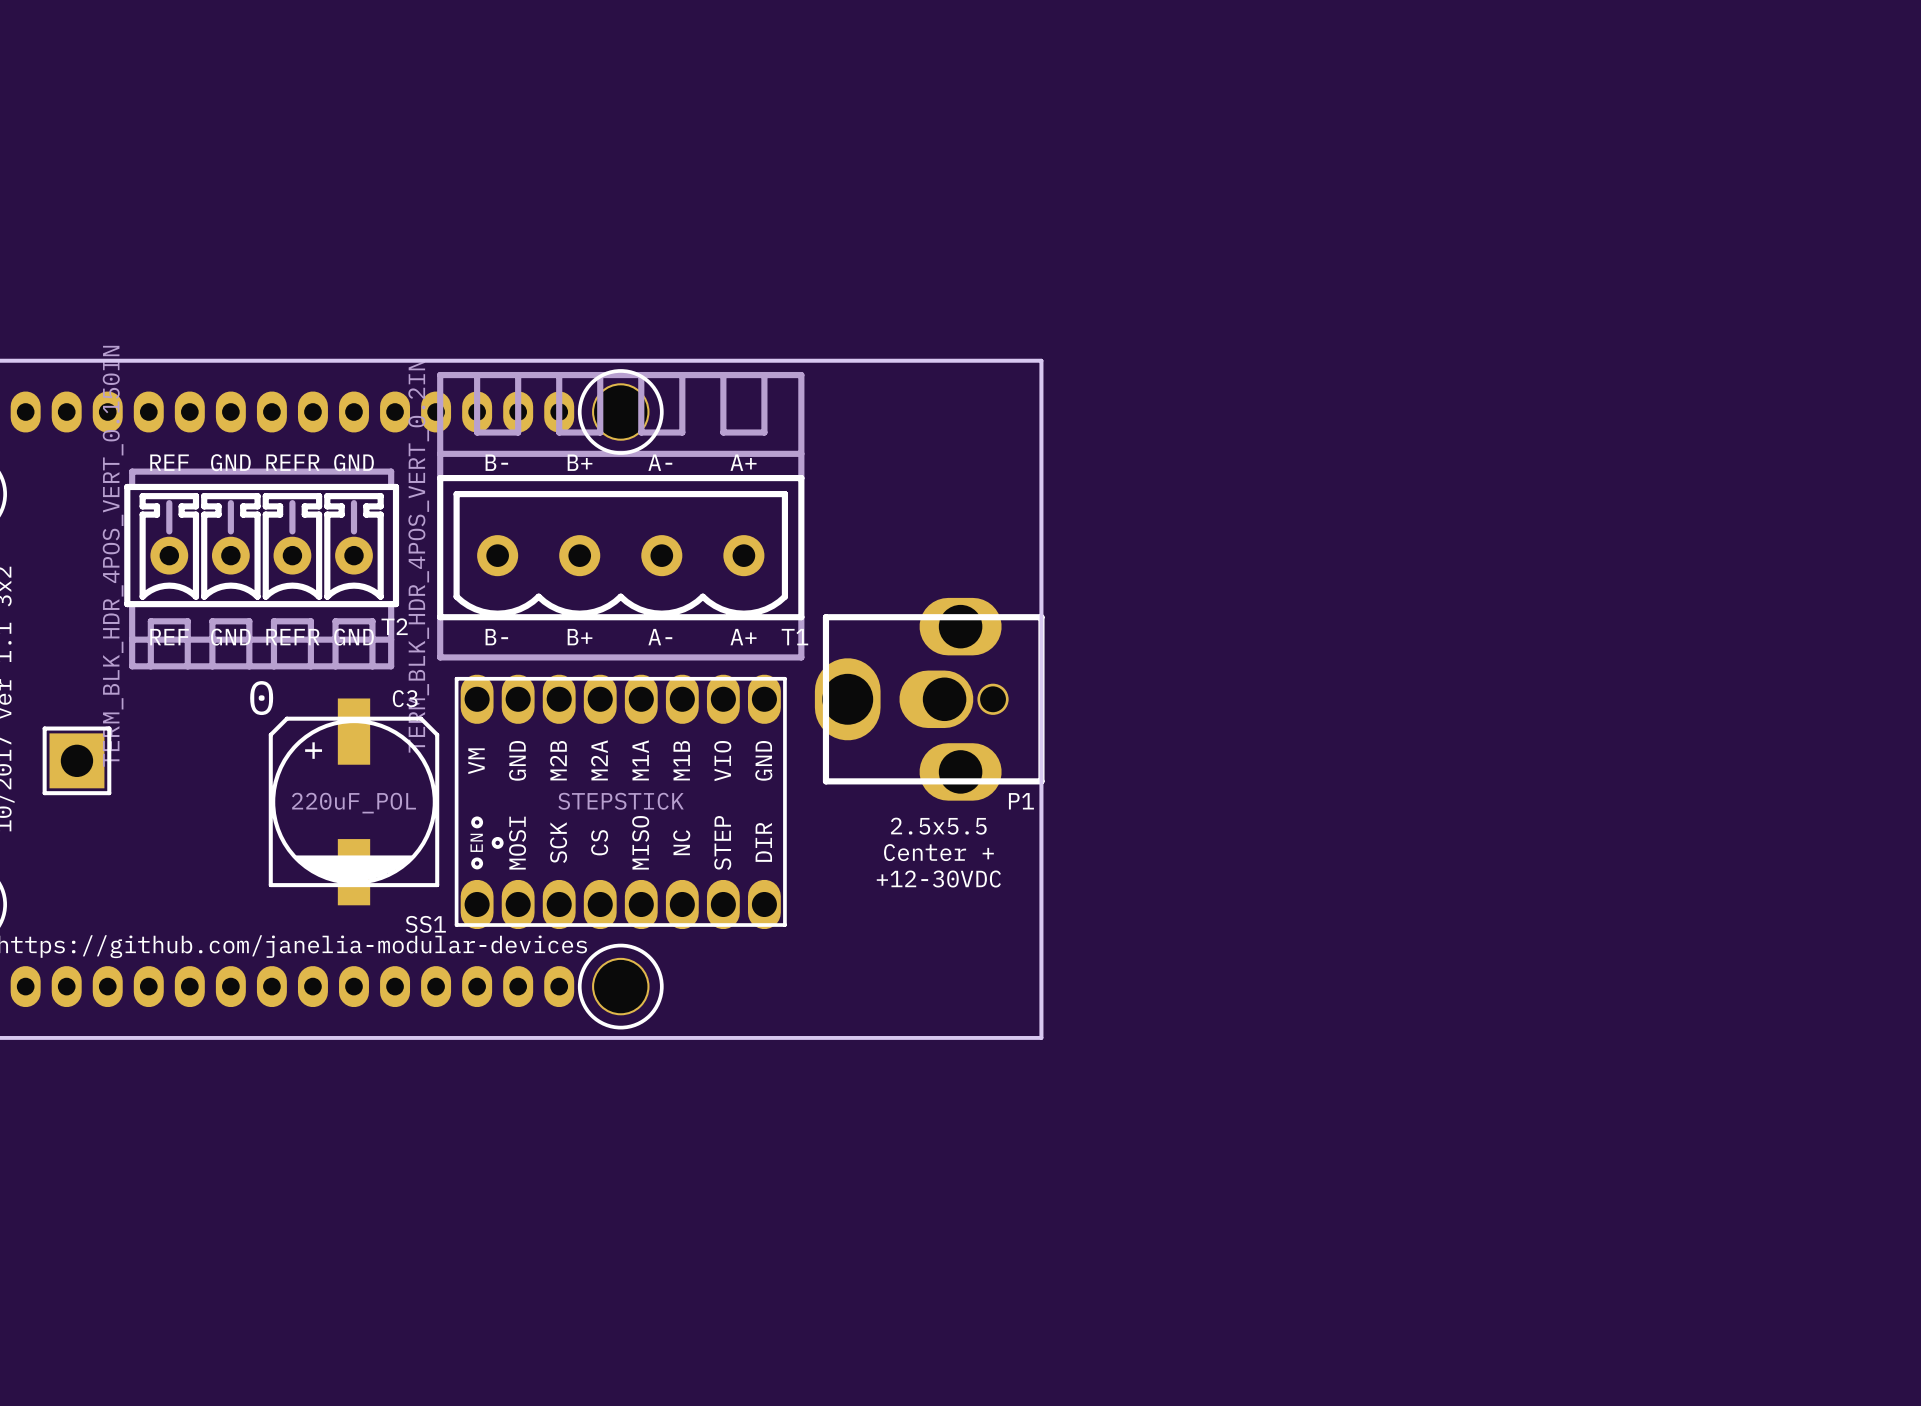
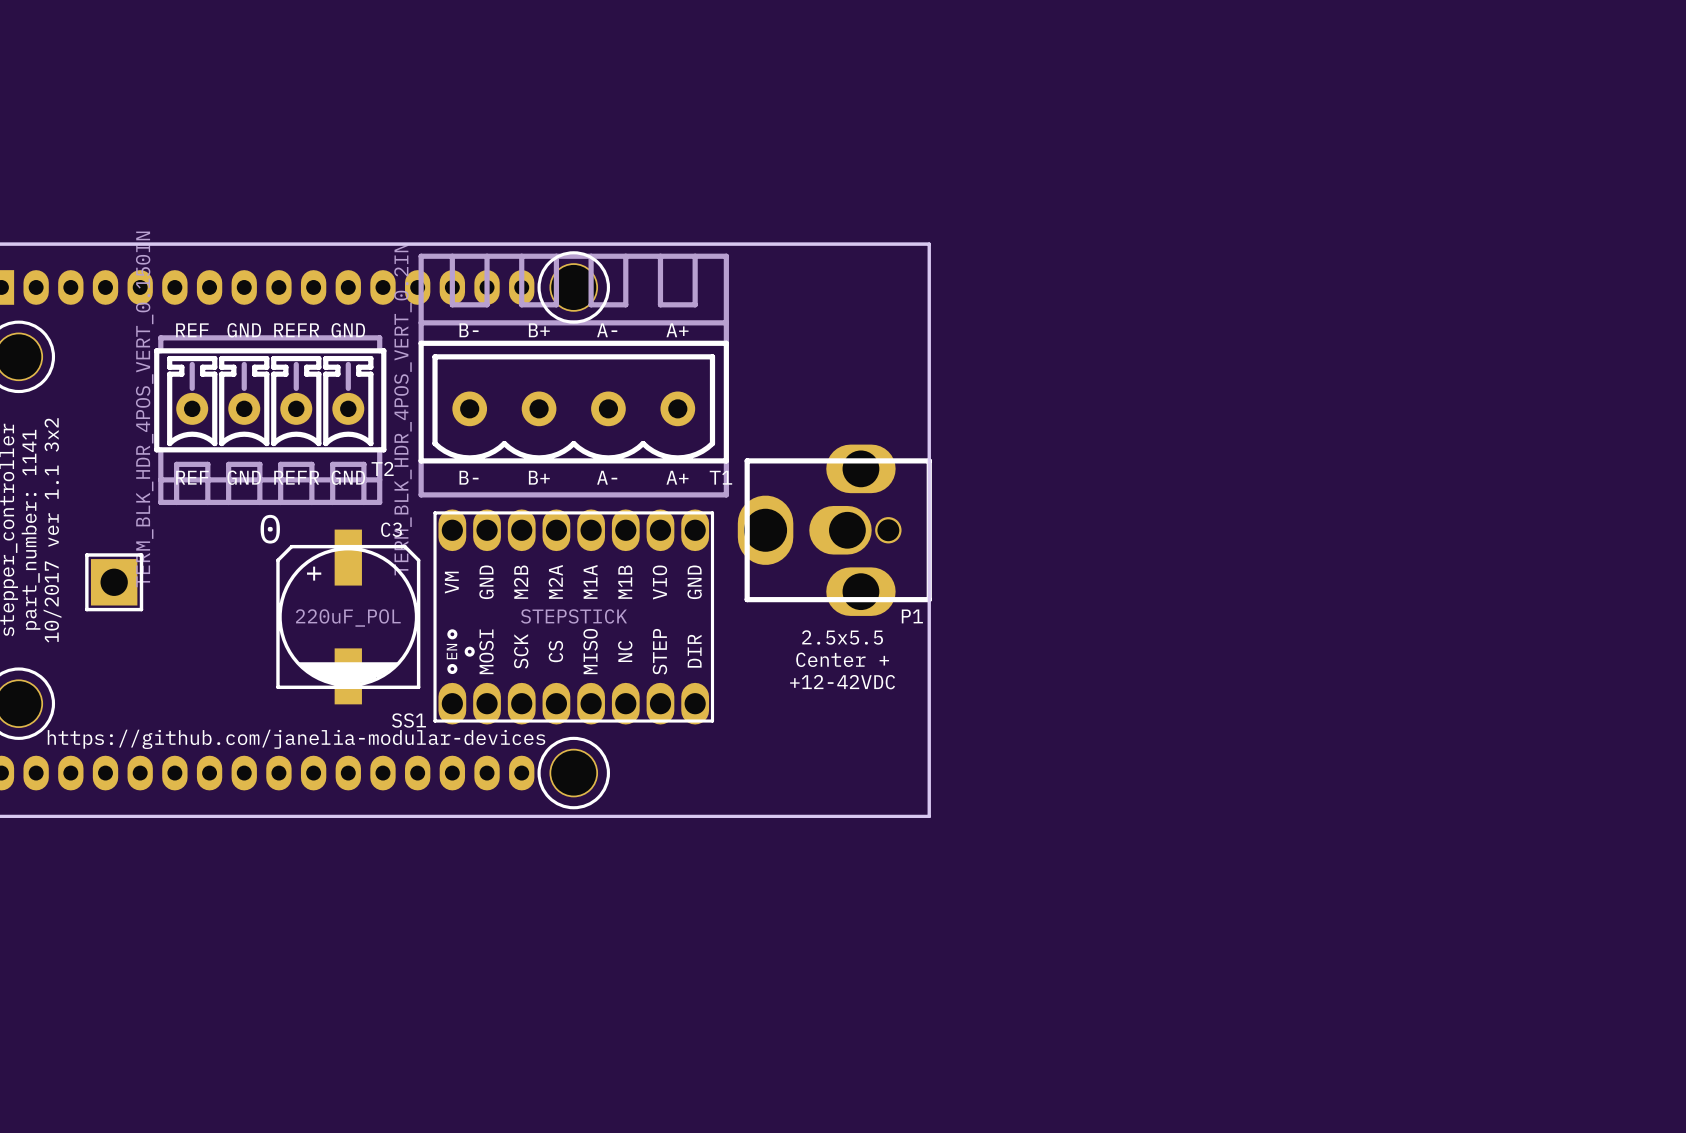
text: +12-30VDC (938, 879) -> +12-42VDC (842, 682)

